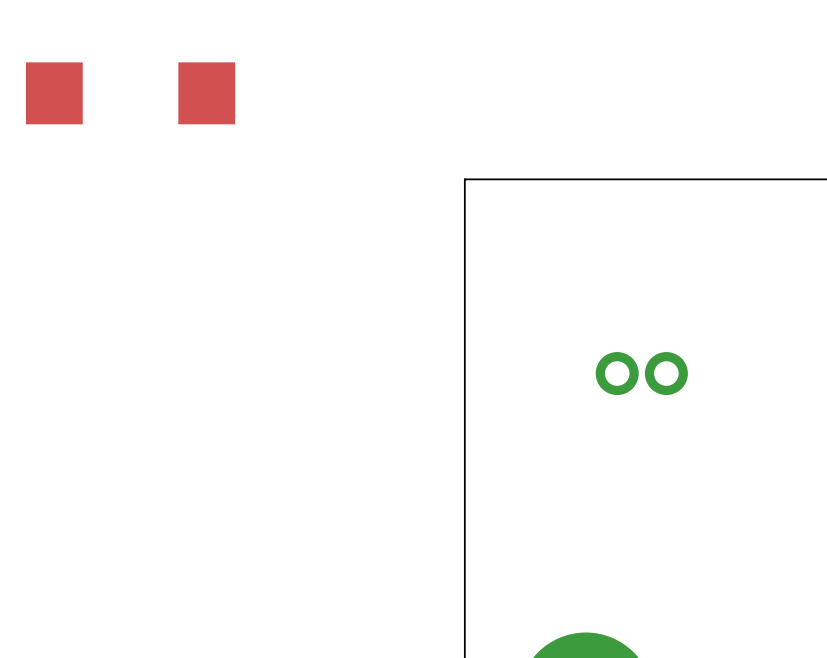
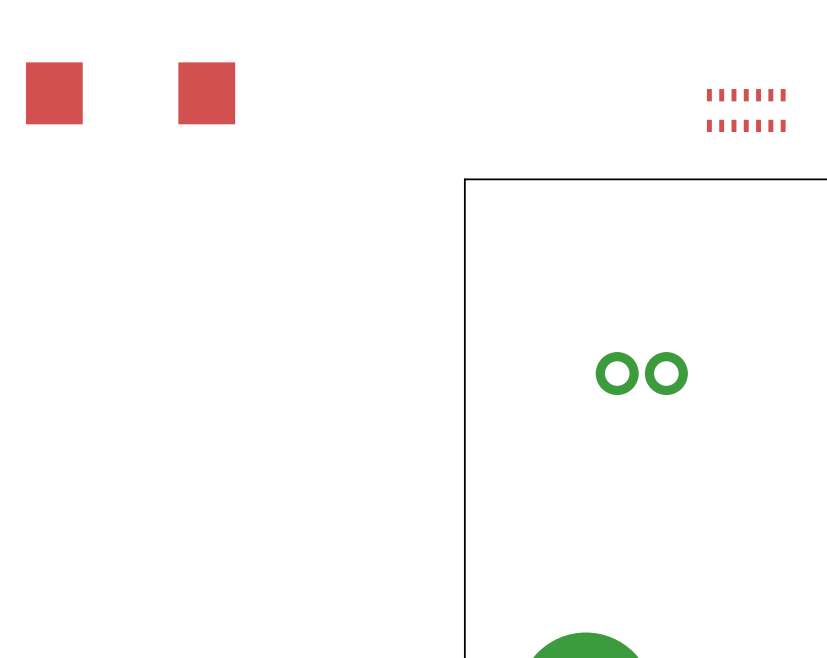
part: none -> (746, 110)

